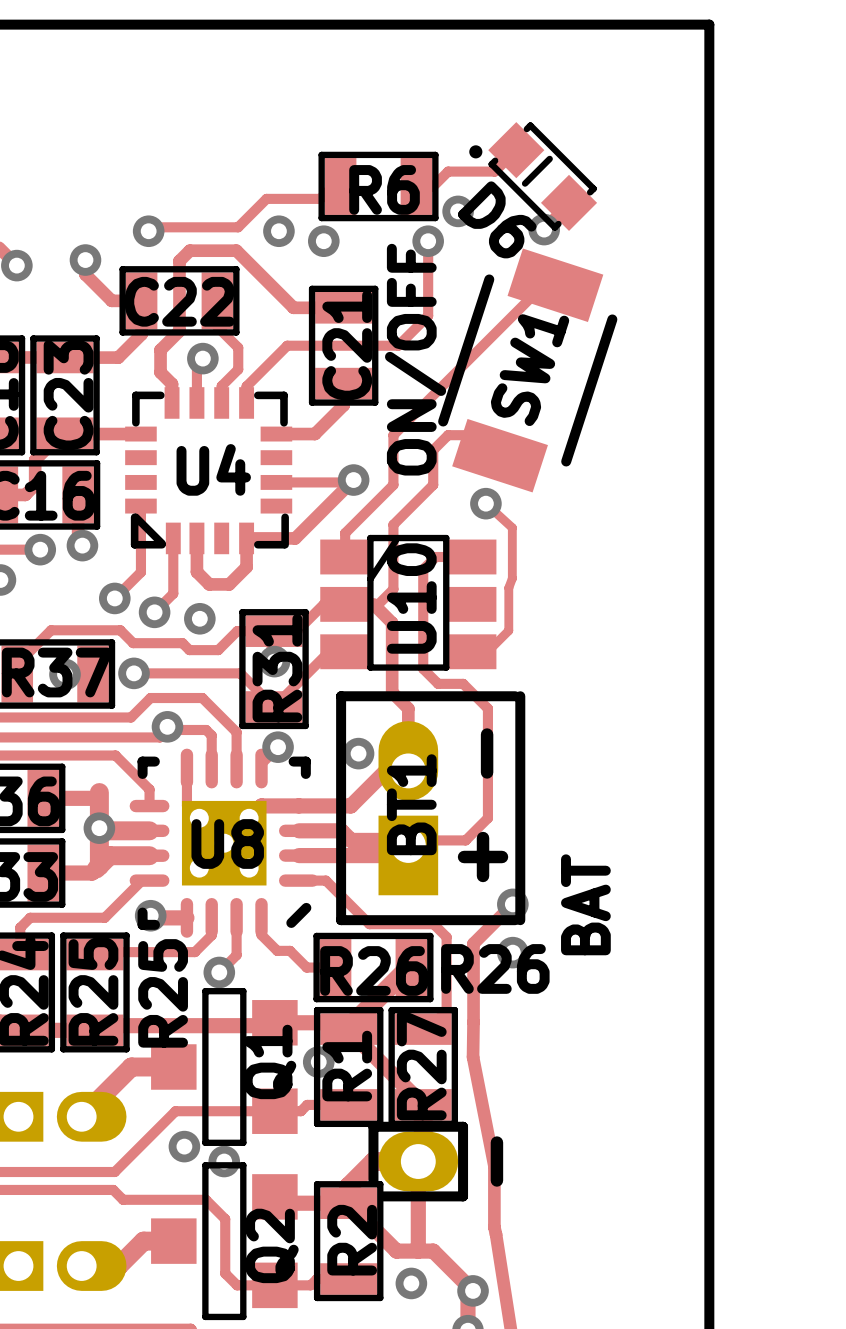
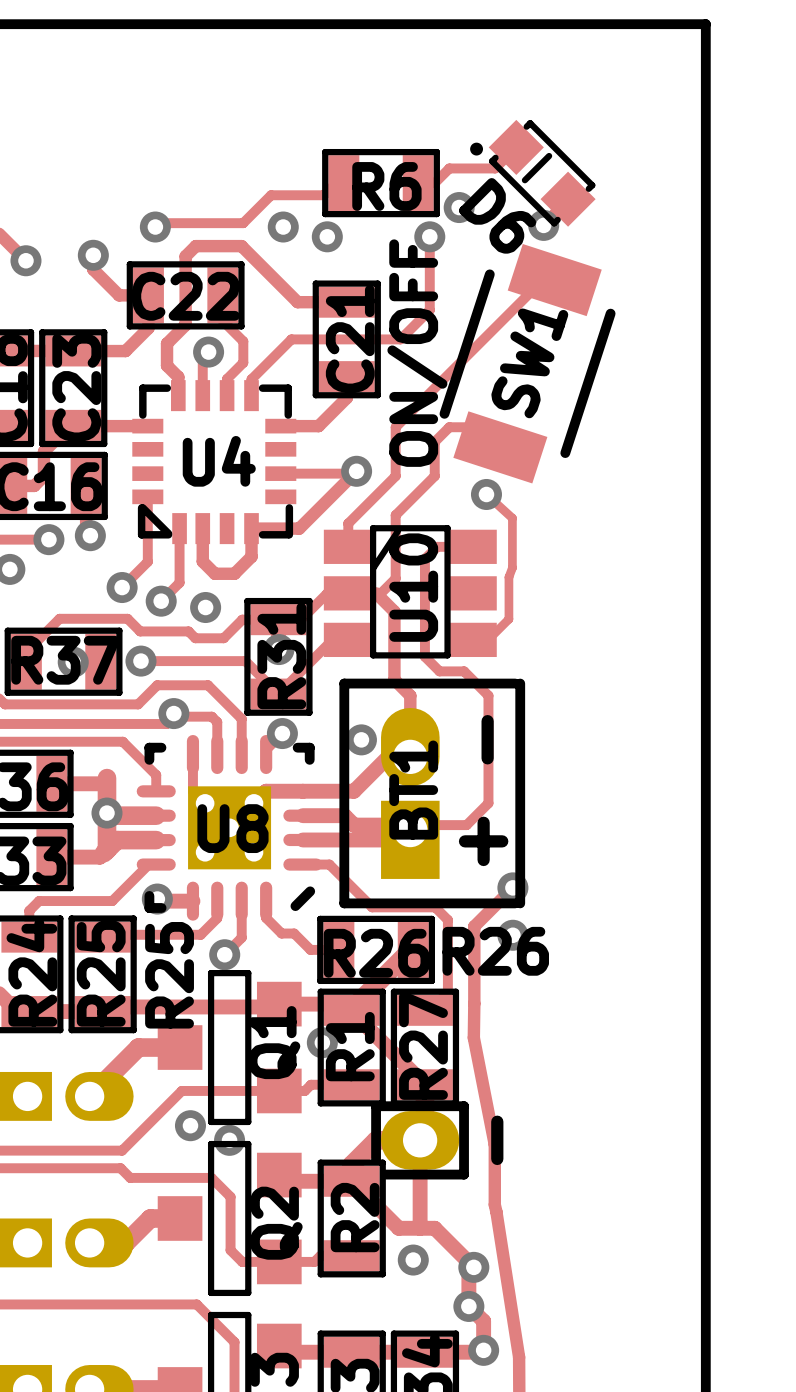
text: BAT (585, 904) -> none

